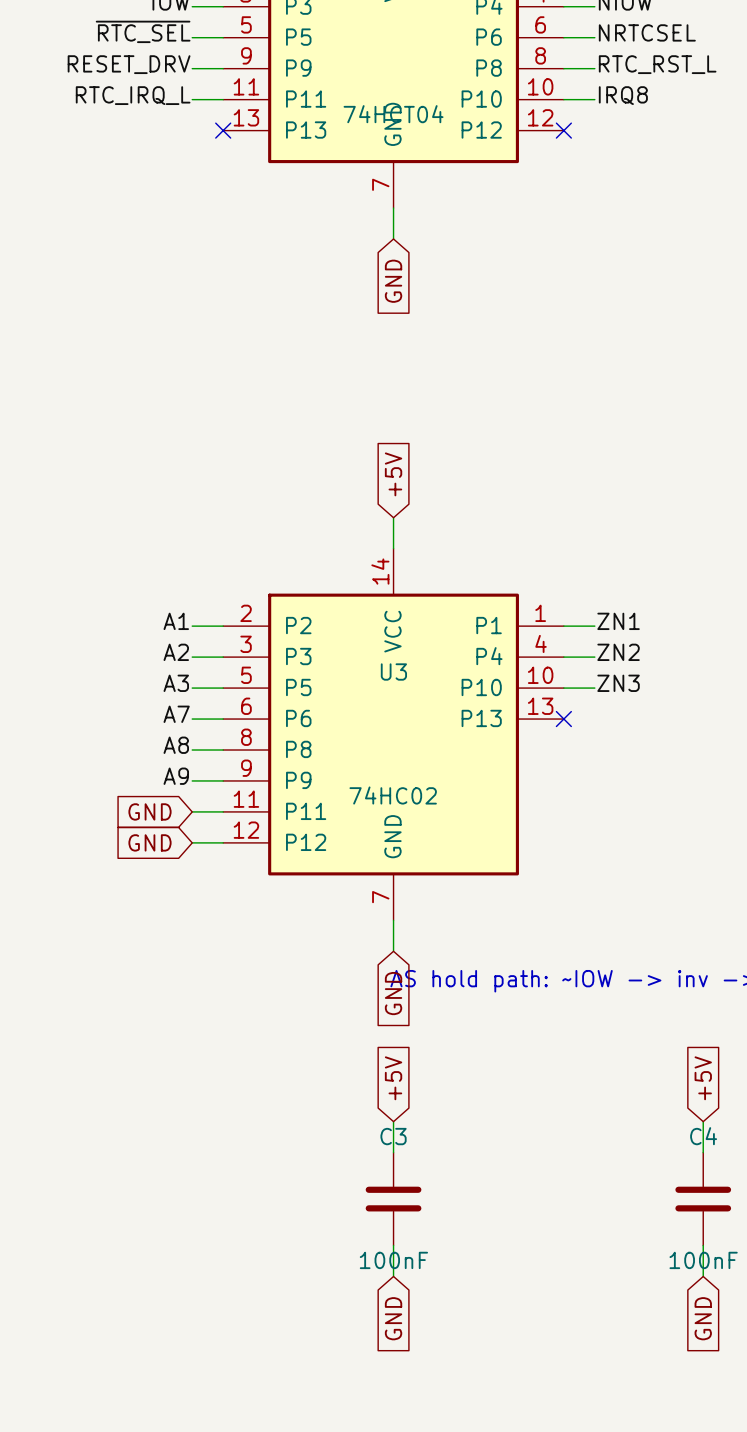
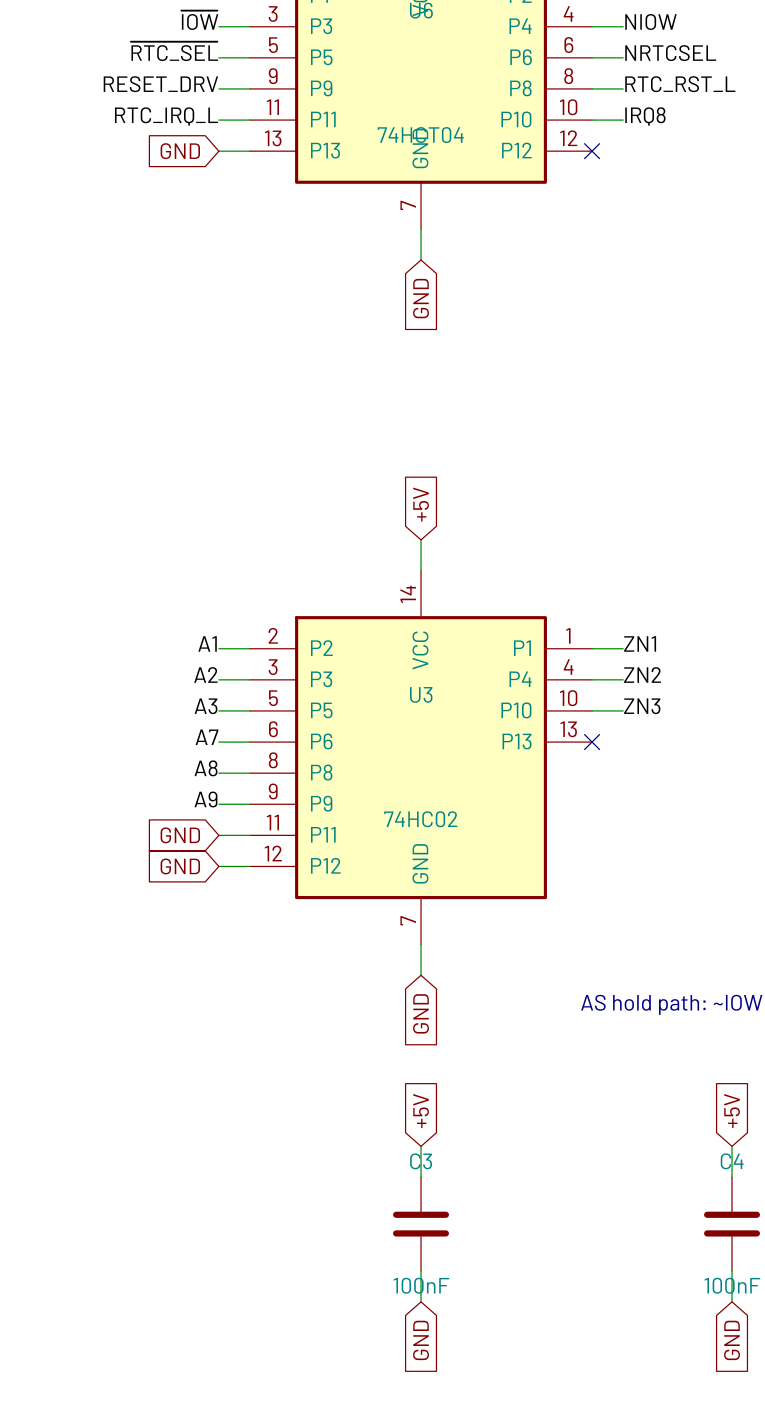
global label: none -> GND (180, 151)
wire: none -> (218, 151) (249, 151)
no-connect mark: (223, 130) -> none

